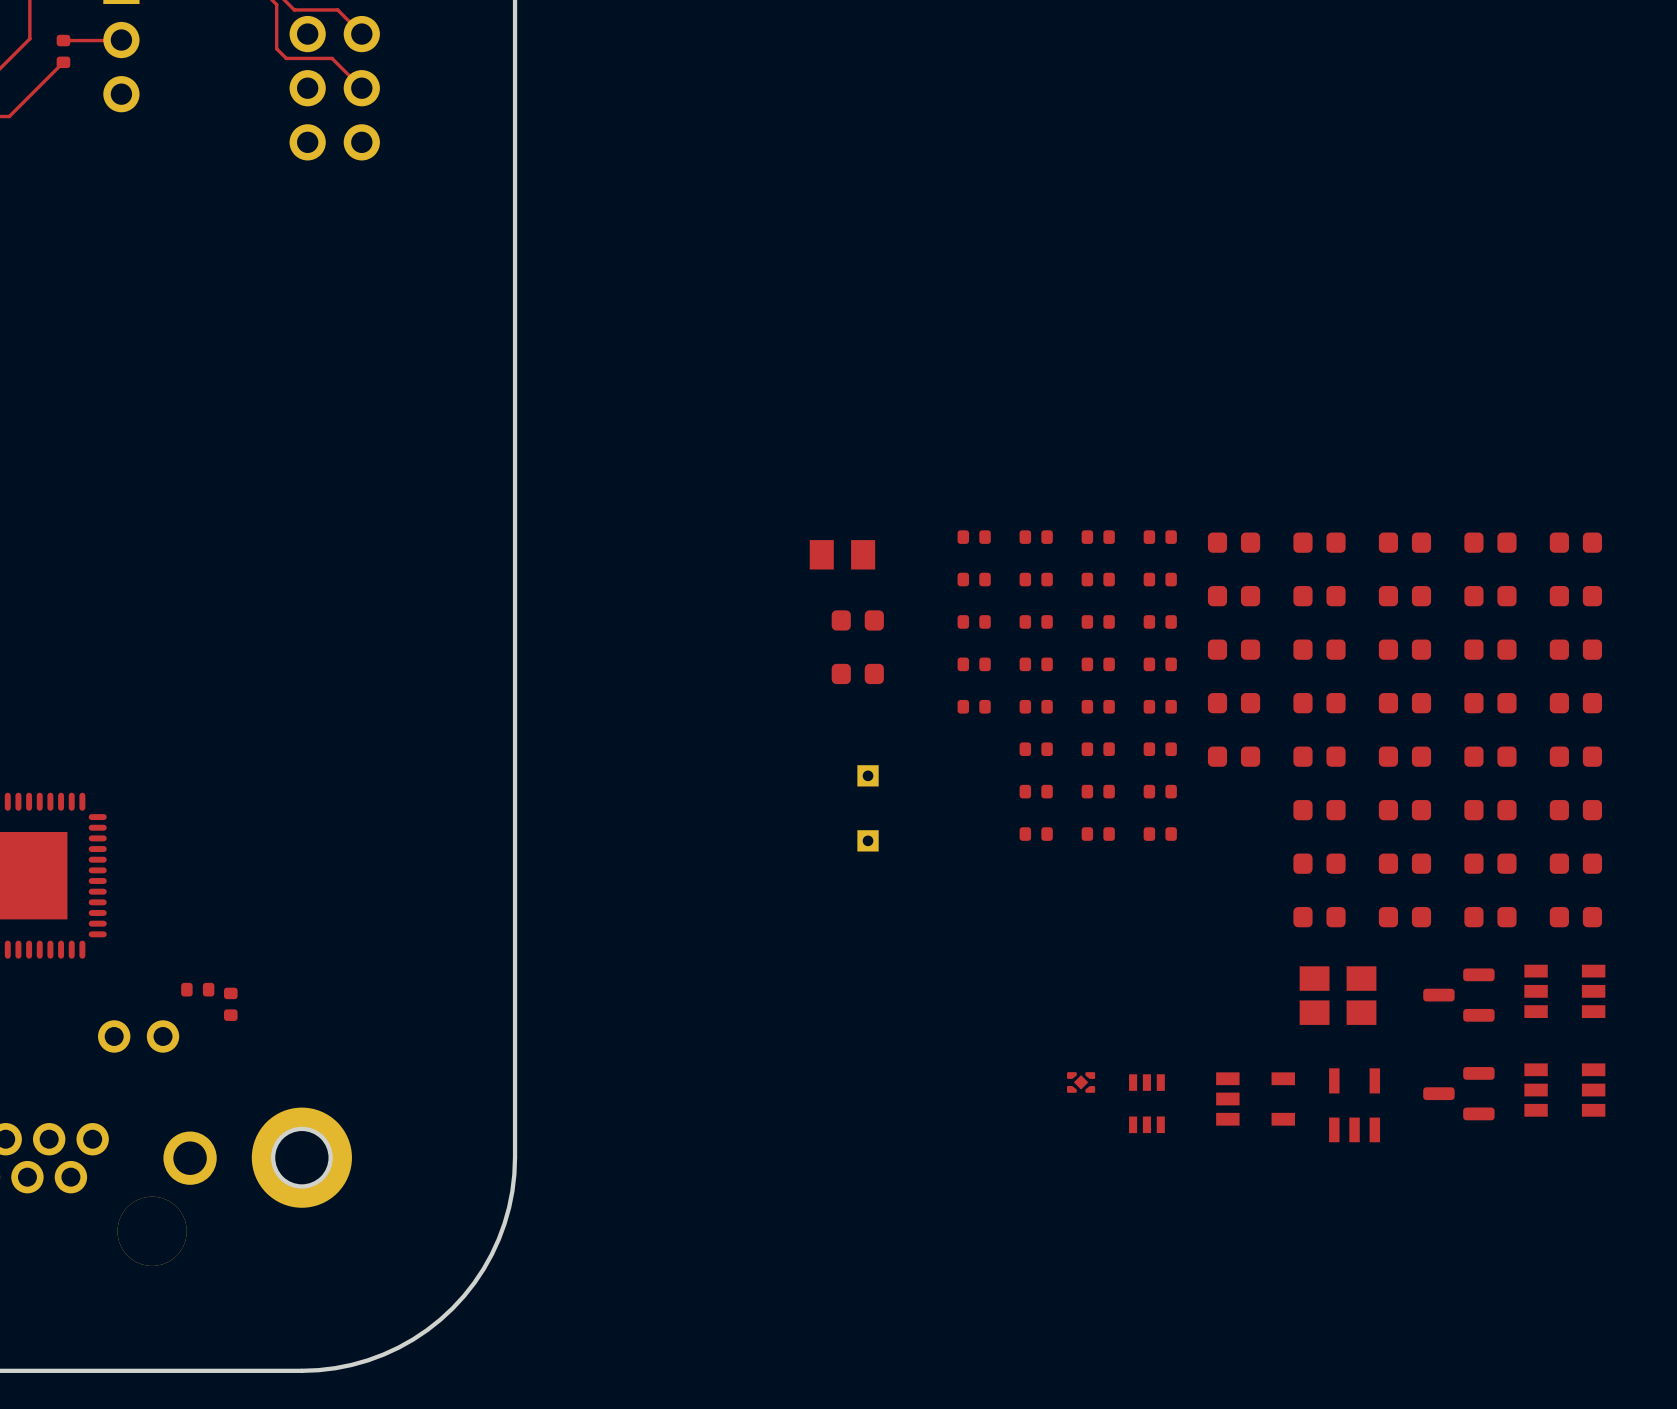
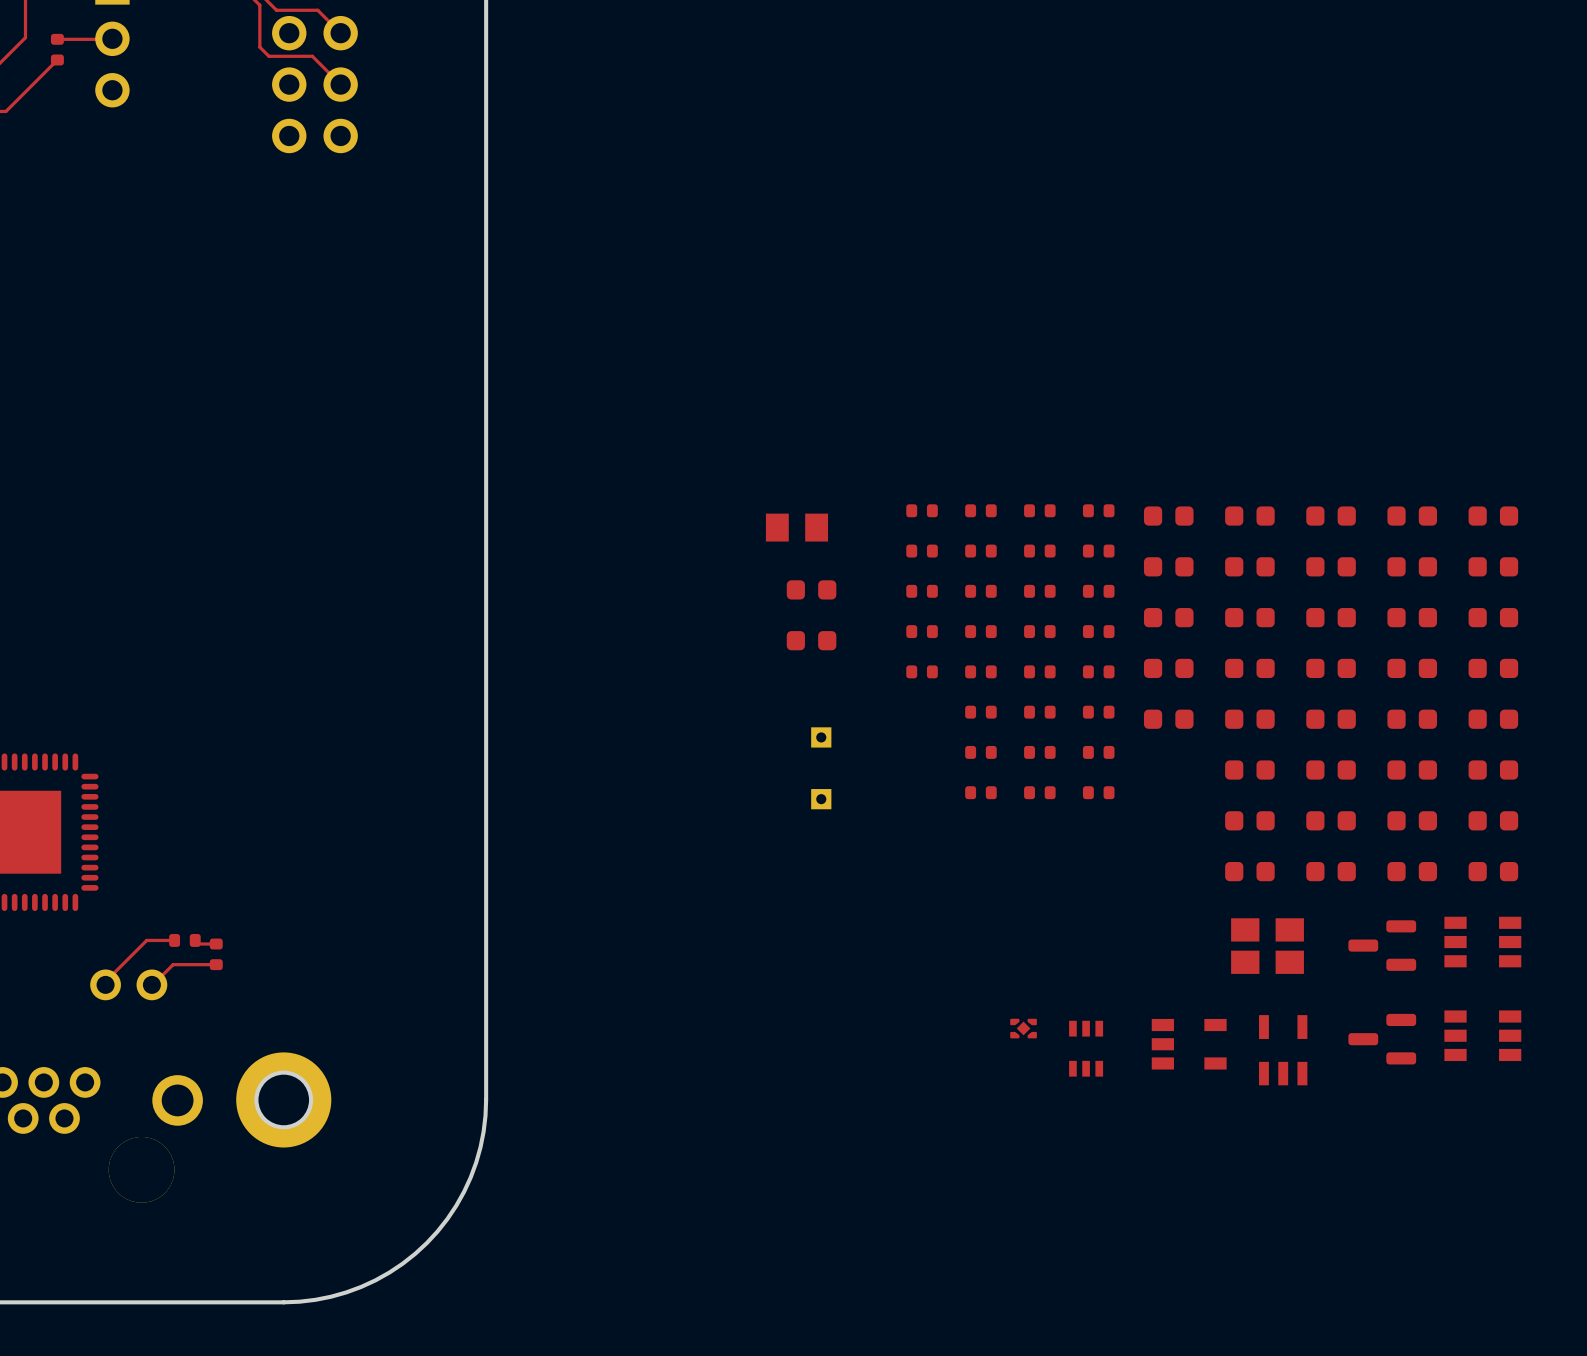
top track: none -> (174, 940) (146, 940) (104, 983)
top track: none -> (195, 940) (198, 944) (216, 944)
top track: none -> (216, 964) (173, 964) (152, 985)

